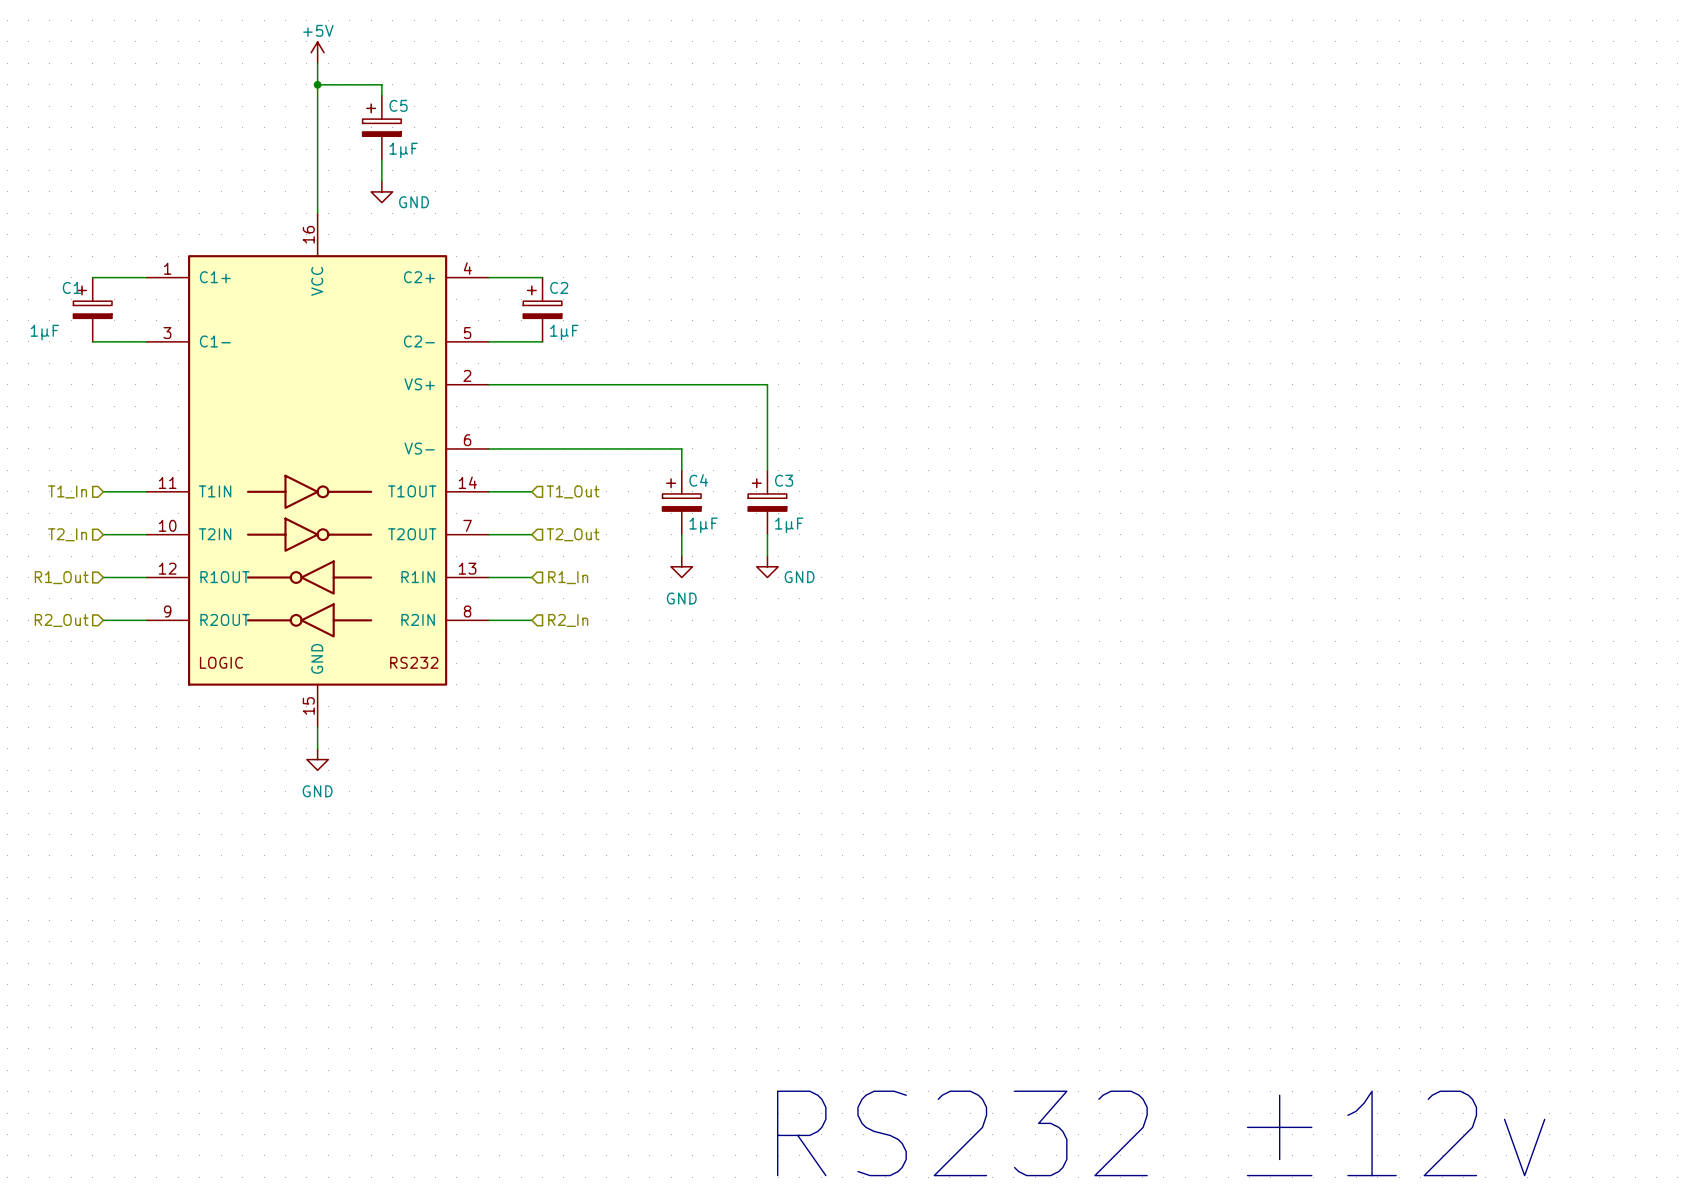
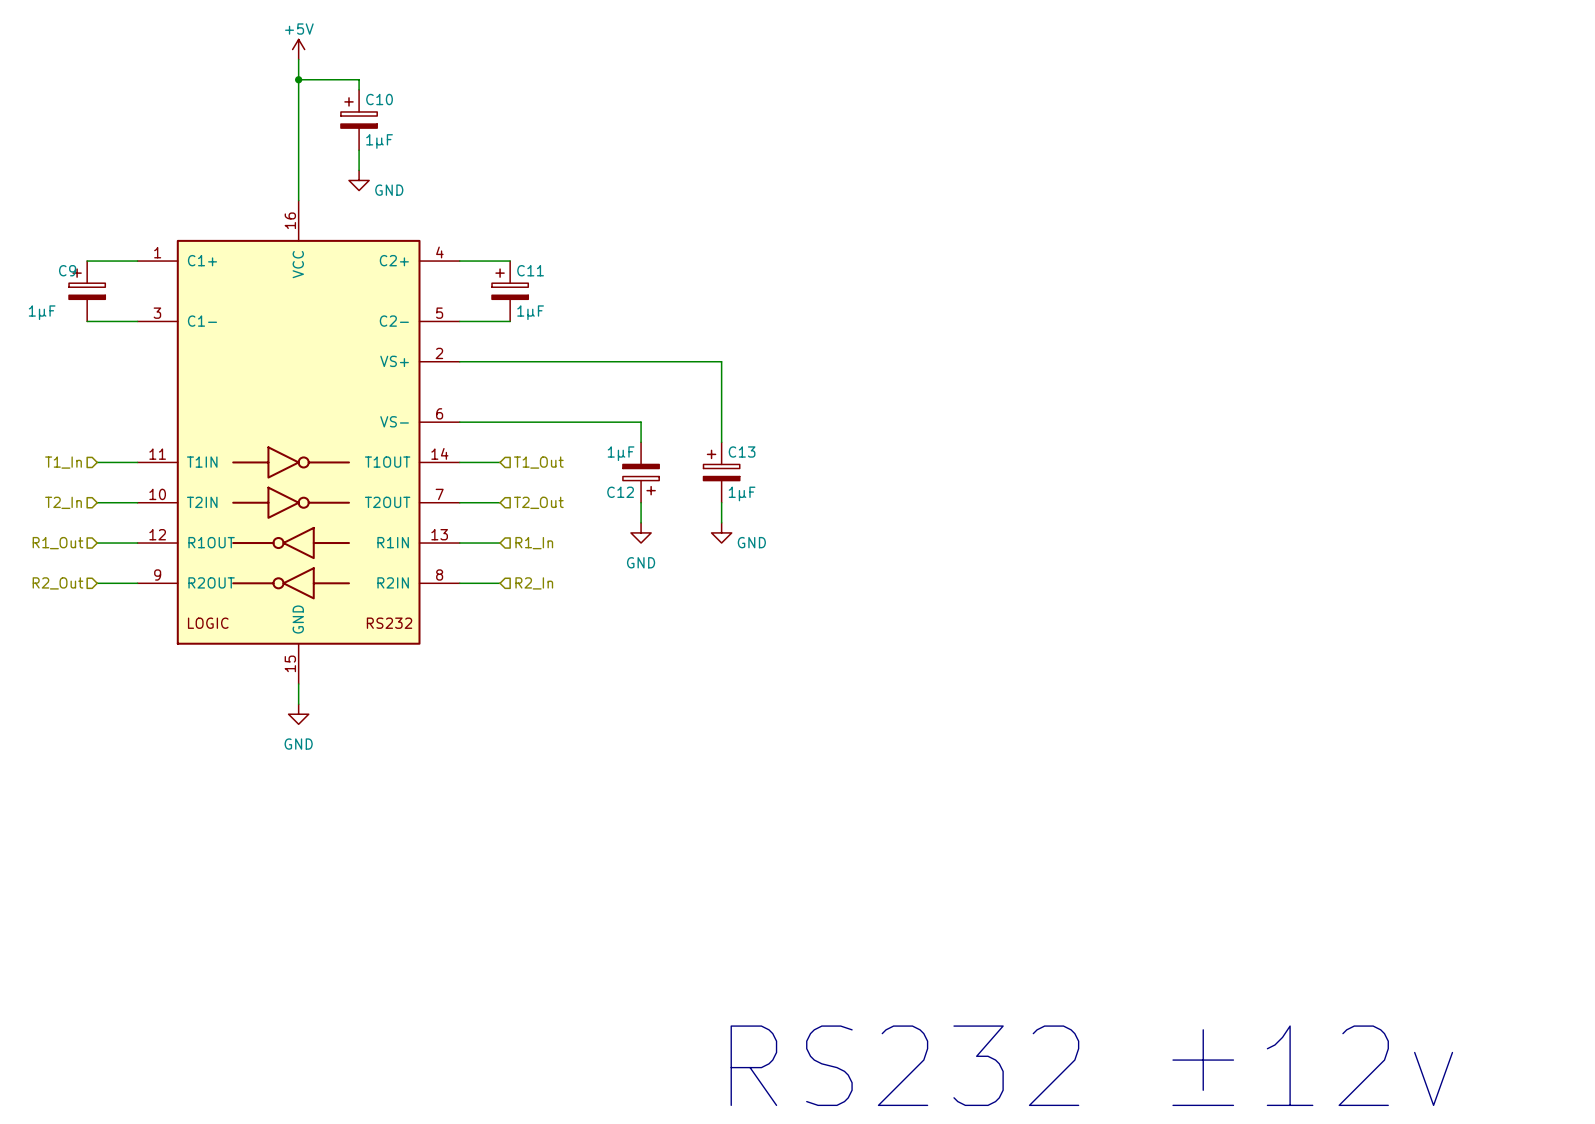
C5 name: C5 (398, 105) -> C10 (379, 99)
C1 name: C1 (71, 287) -> C9 (67, 270)
C2 name: C2 (559, 287) -> C11 (530, 270)
C3 name: C3 (784, 480) -> C13 (742, 452)
C4: 1µF (681, 502) -> none
C12: none -> 1µF (641, 472)

